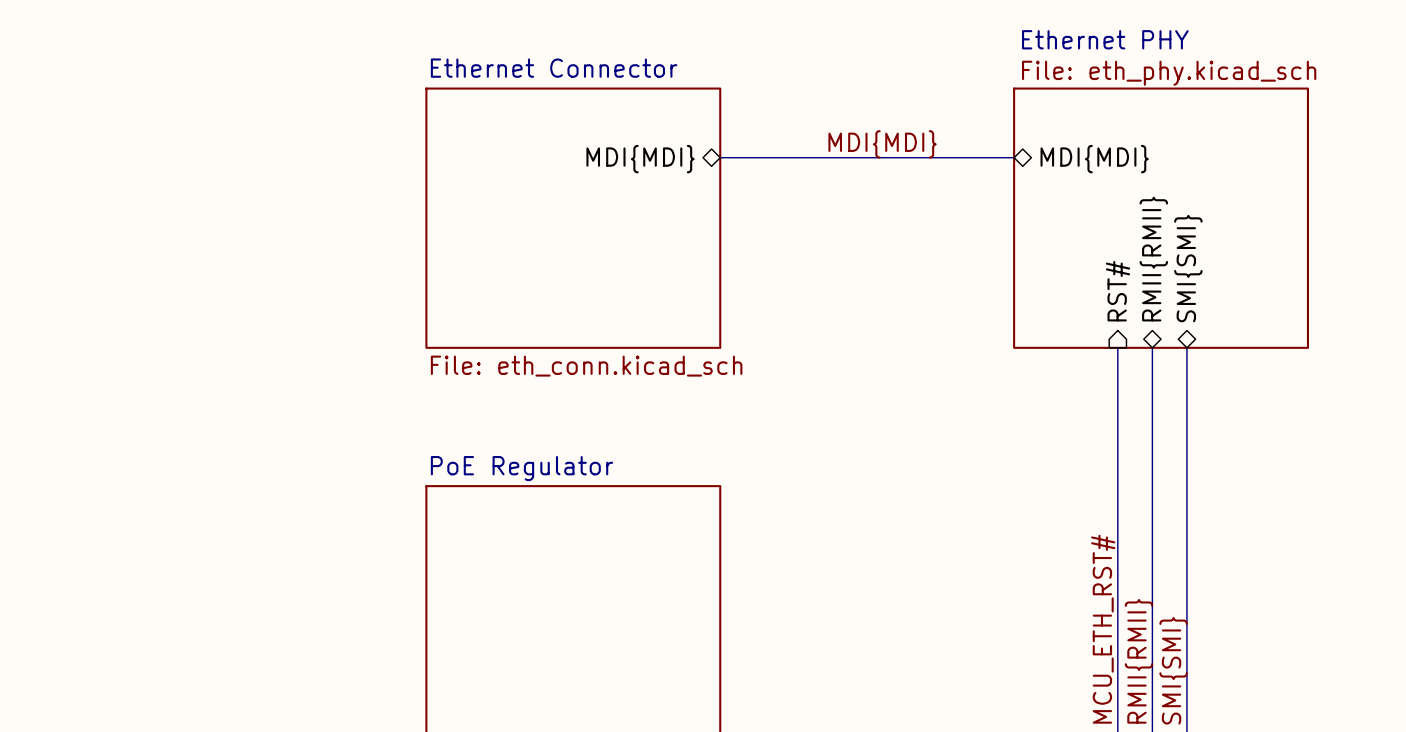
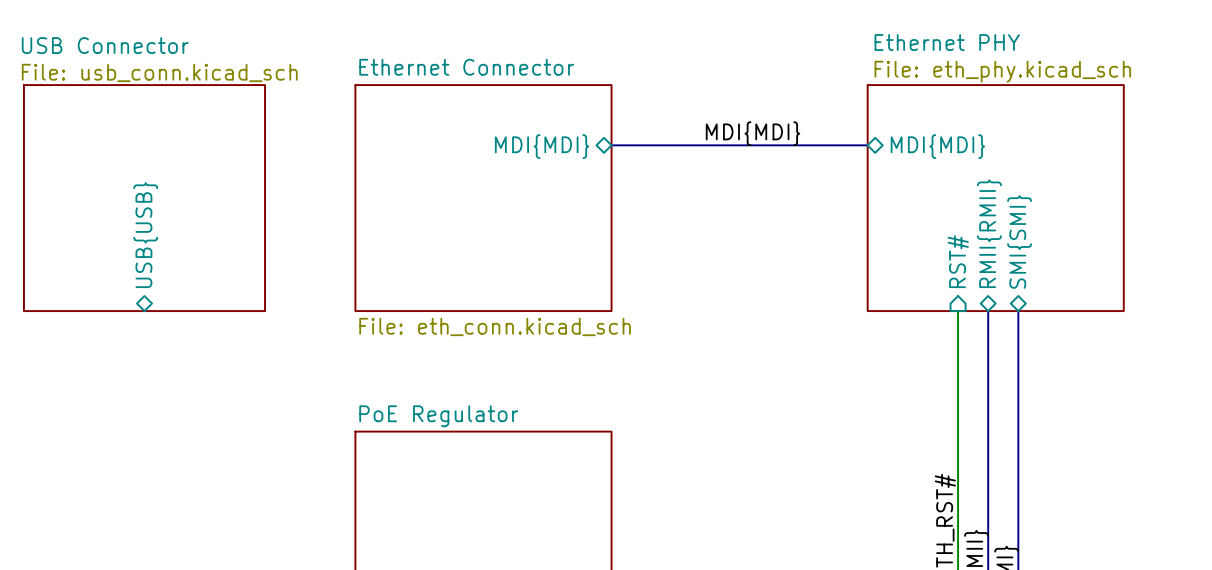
sheet USB Connector: none -> File: usb_conn.kicad_sch (144, 198)
sheet pin: none -> USB{USB} (145, 235)

